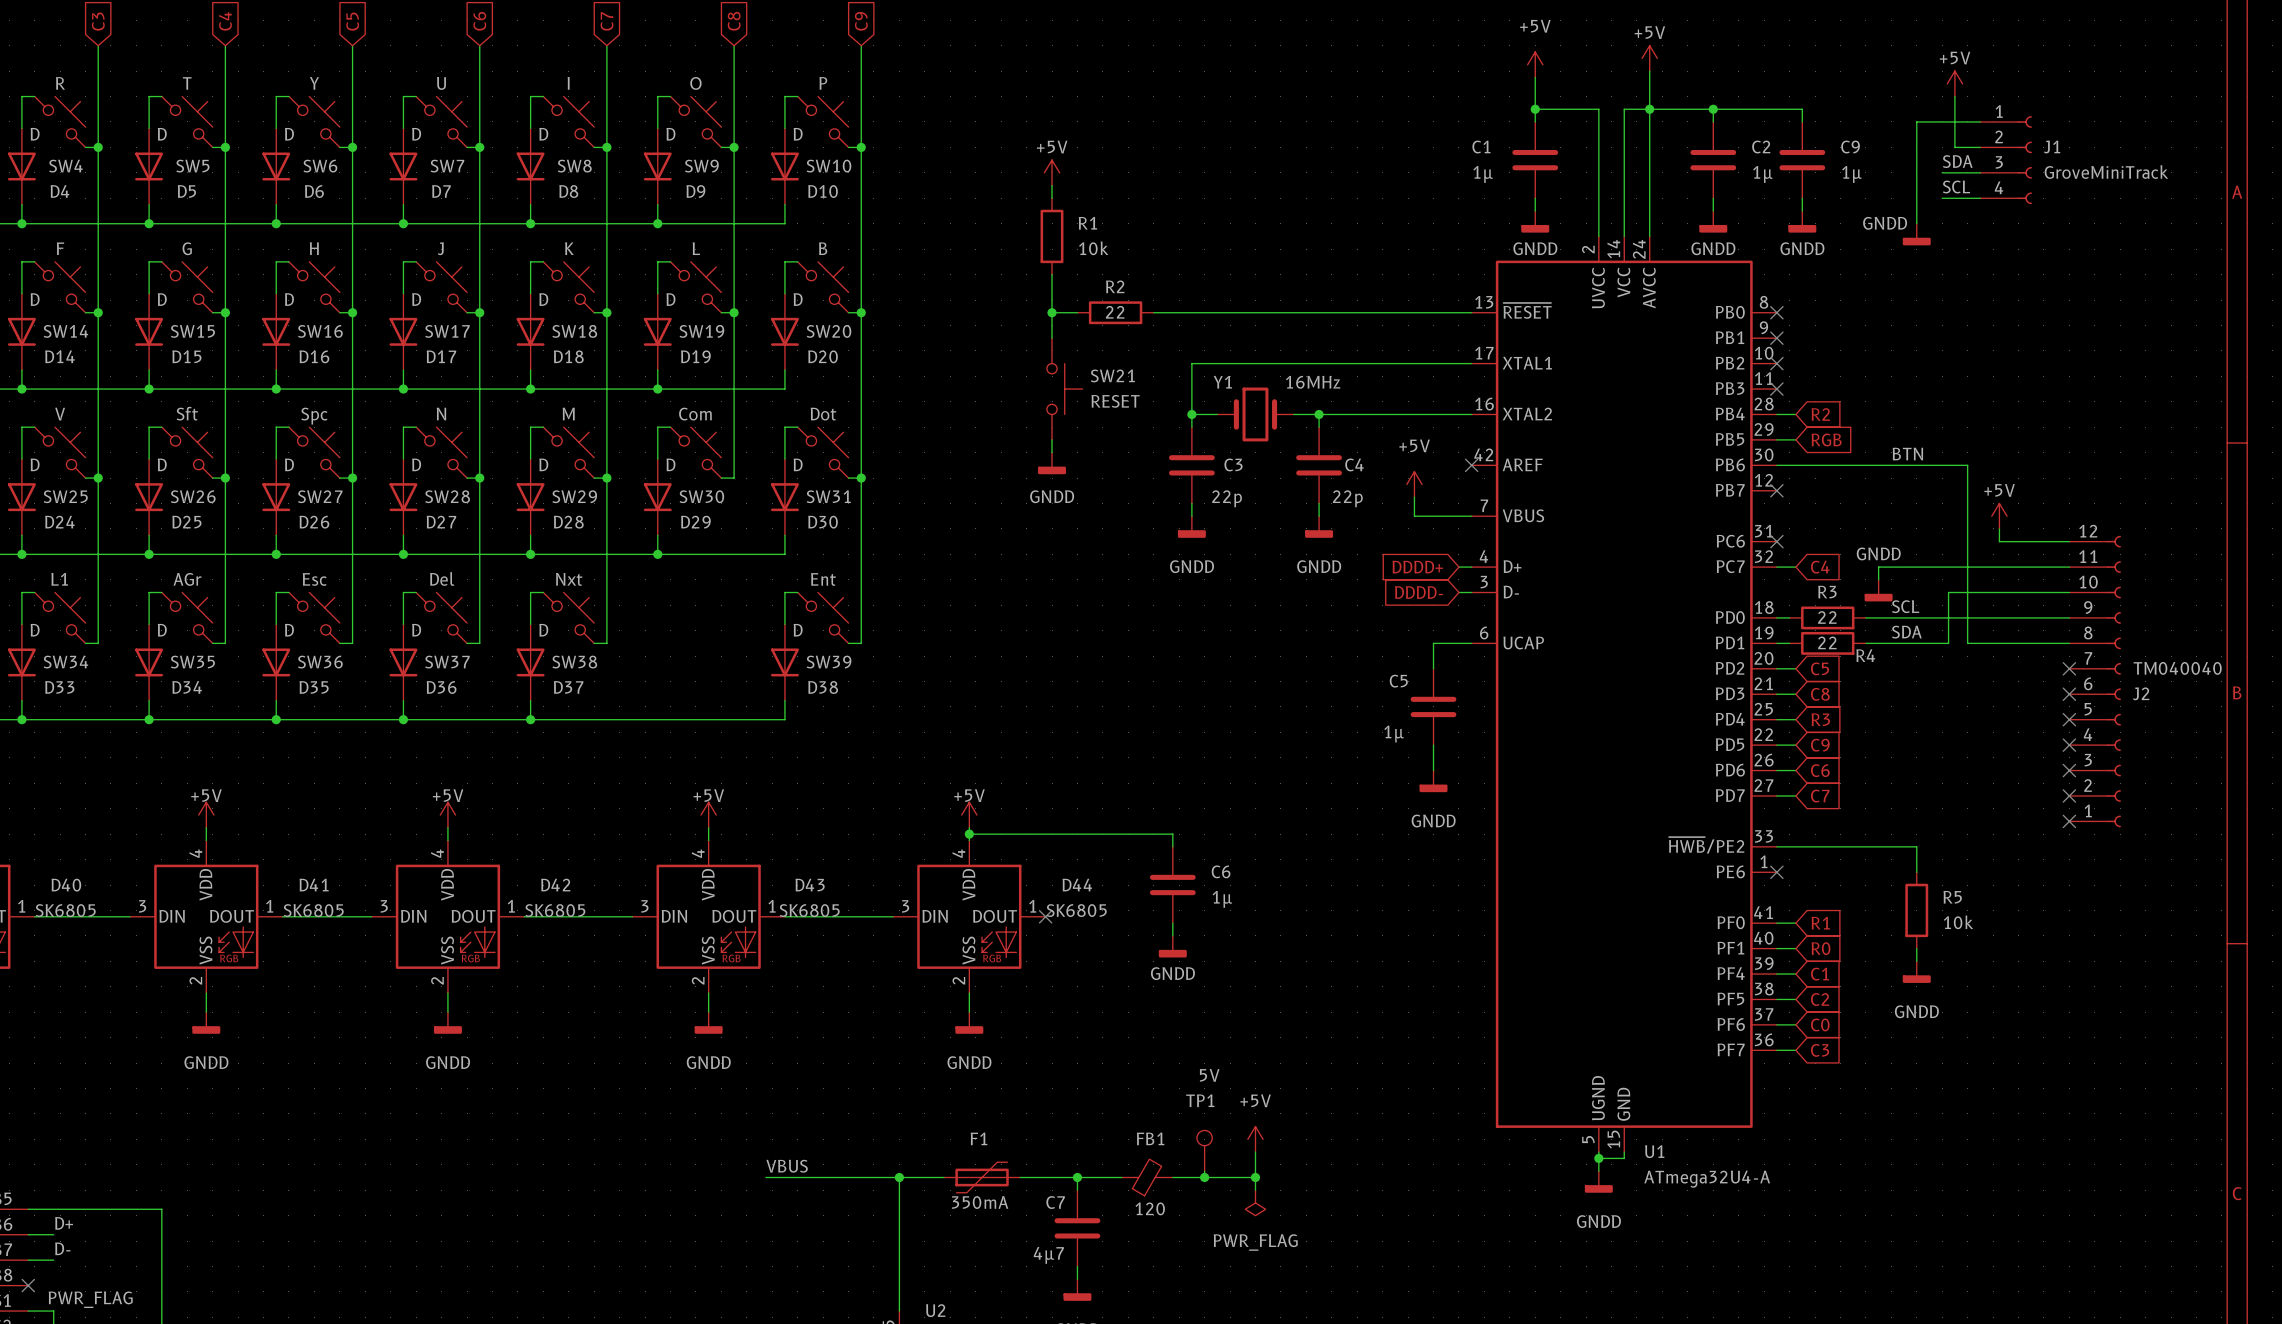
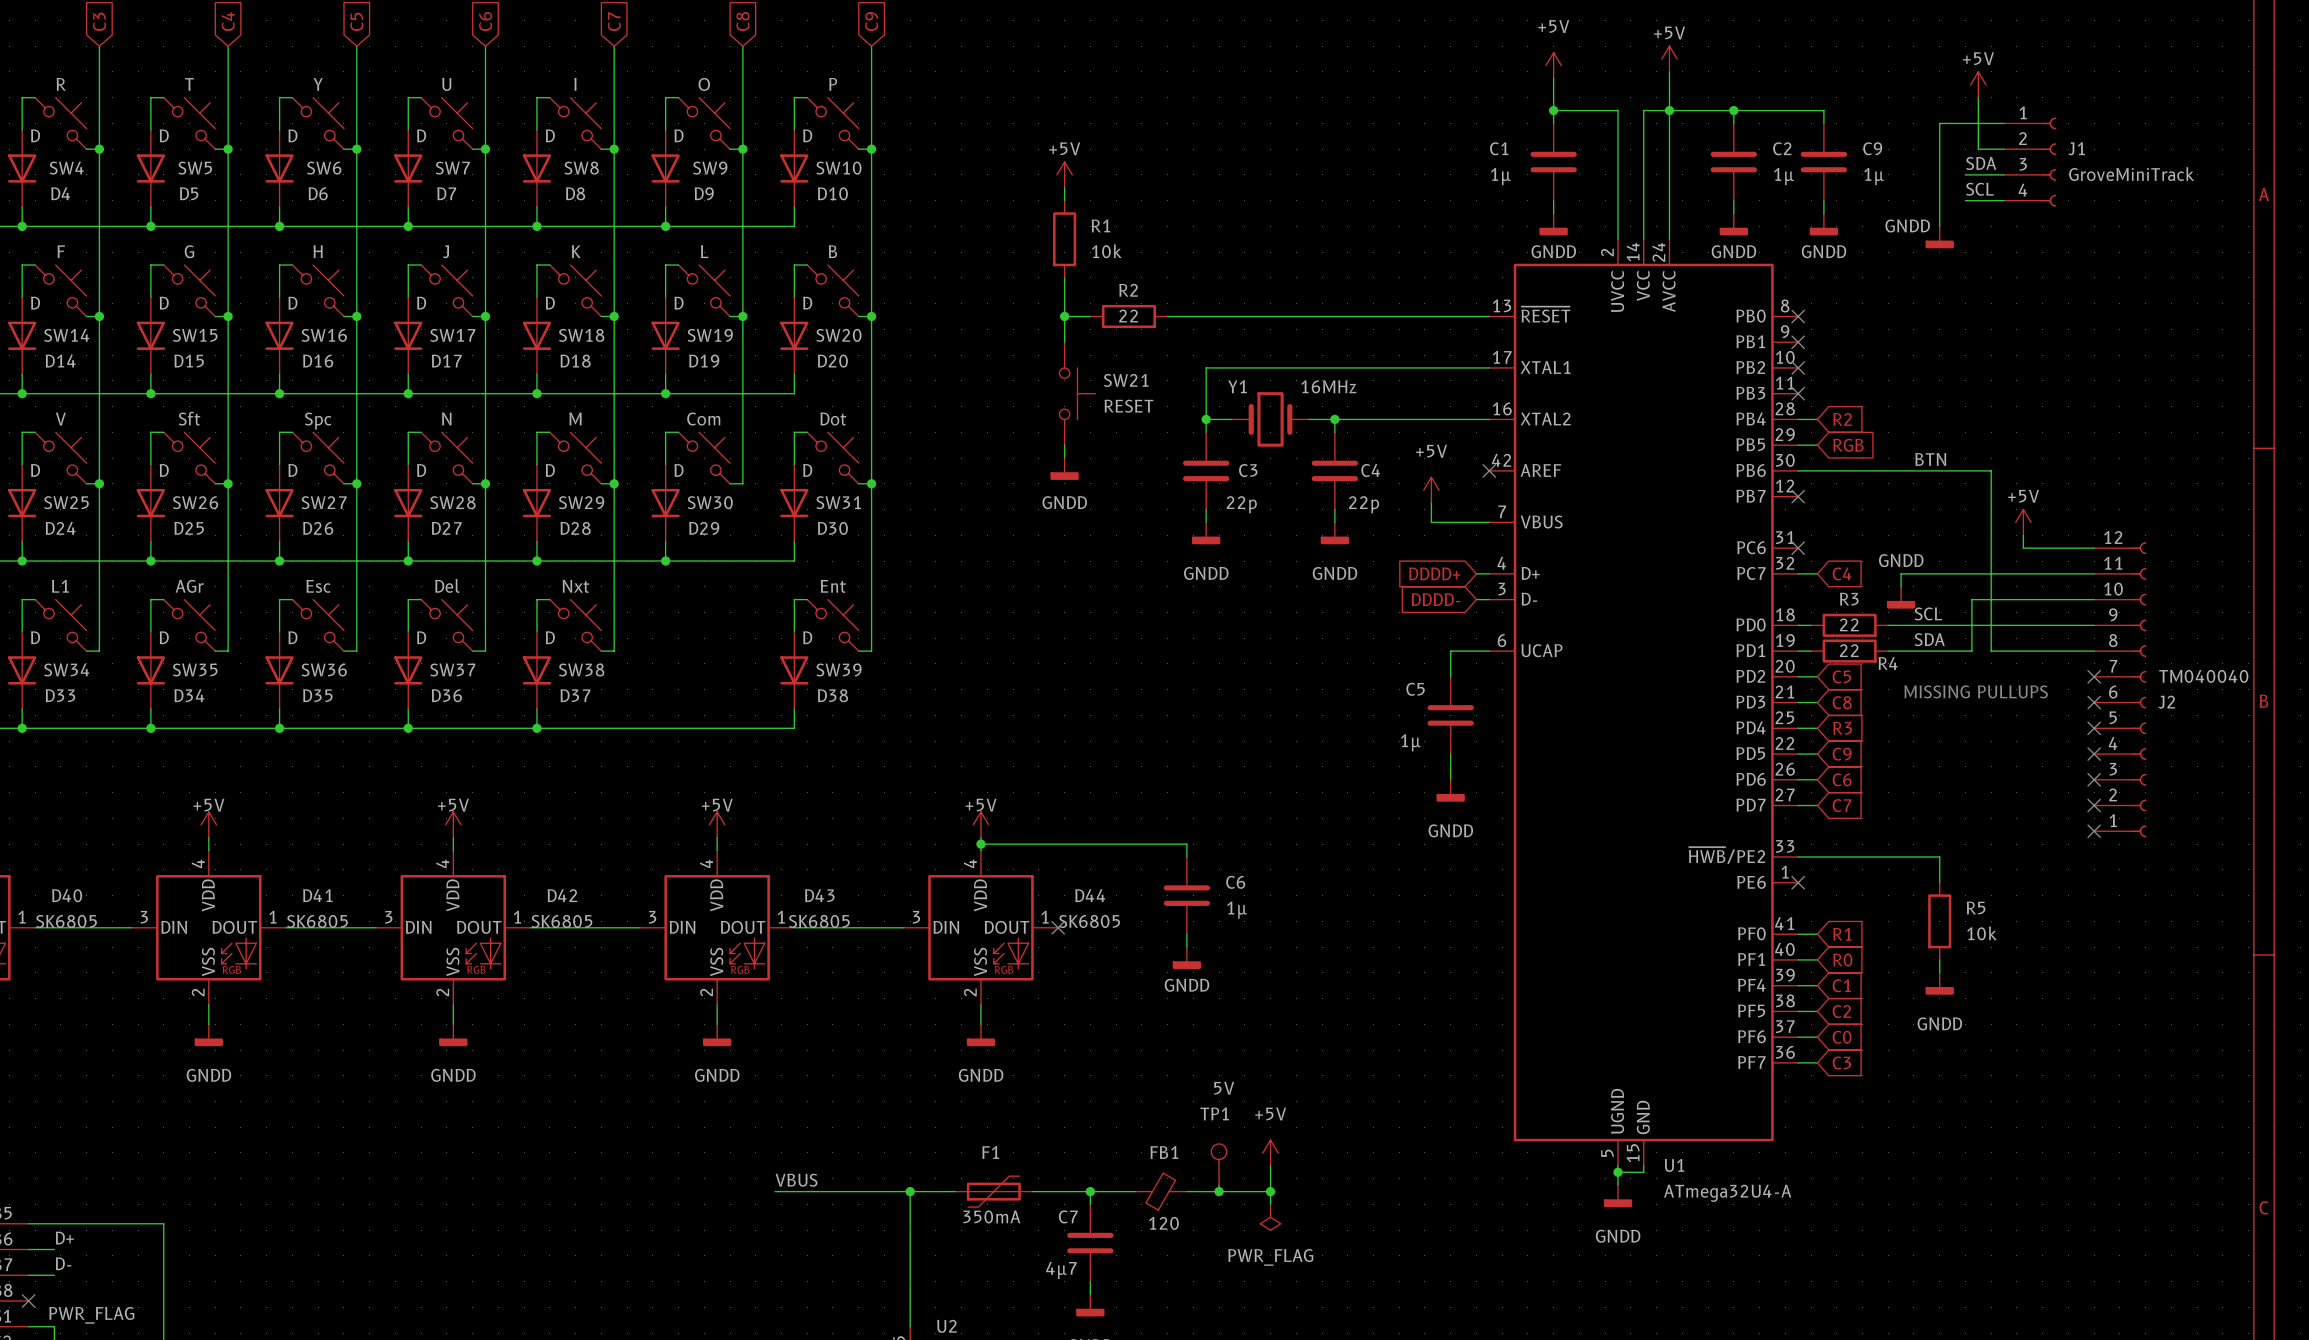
text: none -> MISSING PULLUPS (1976, 691)

